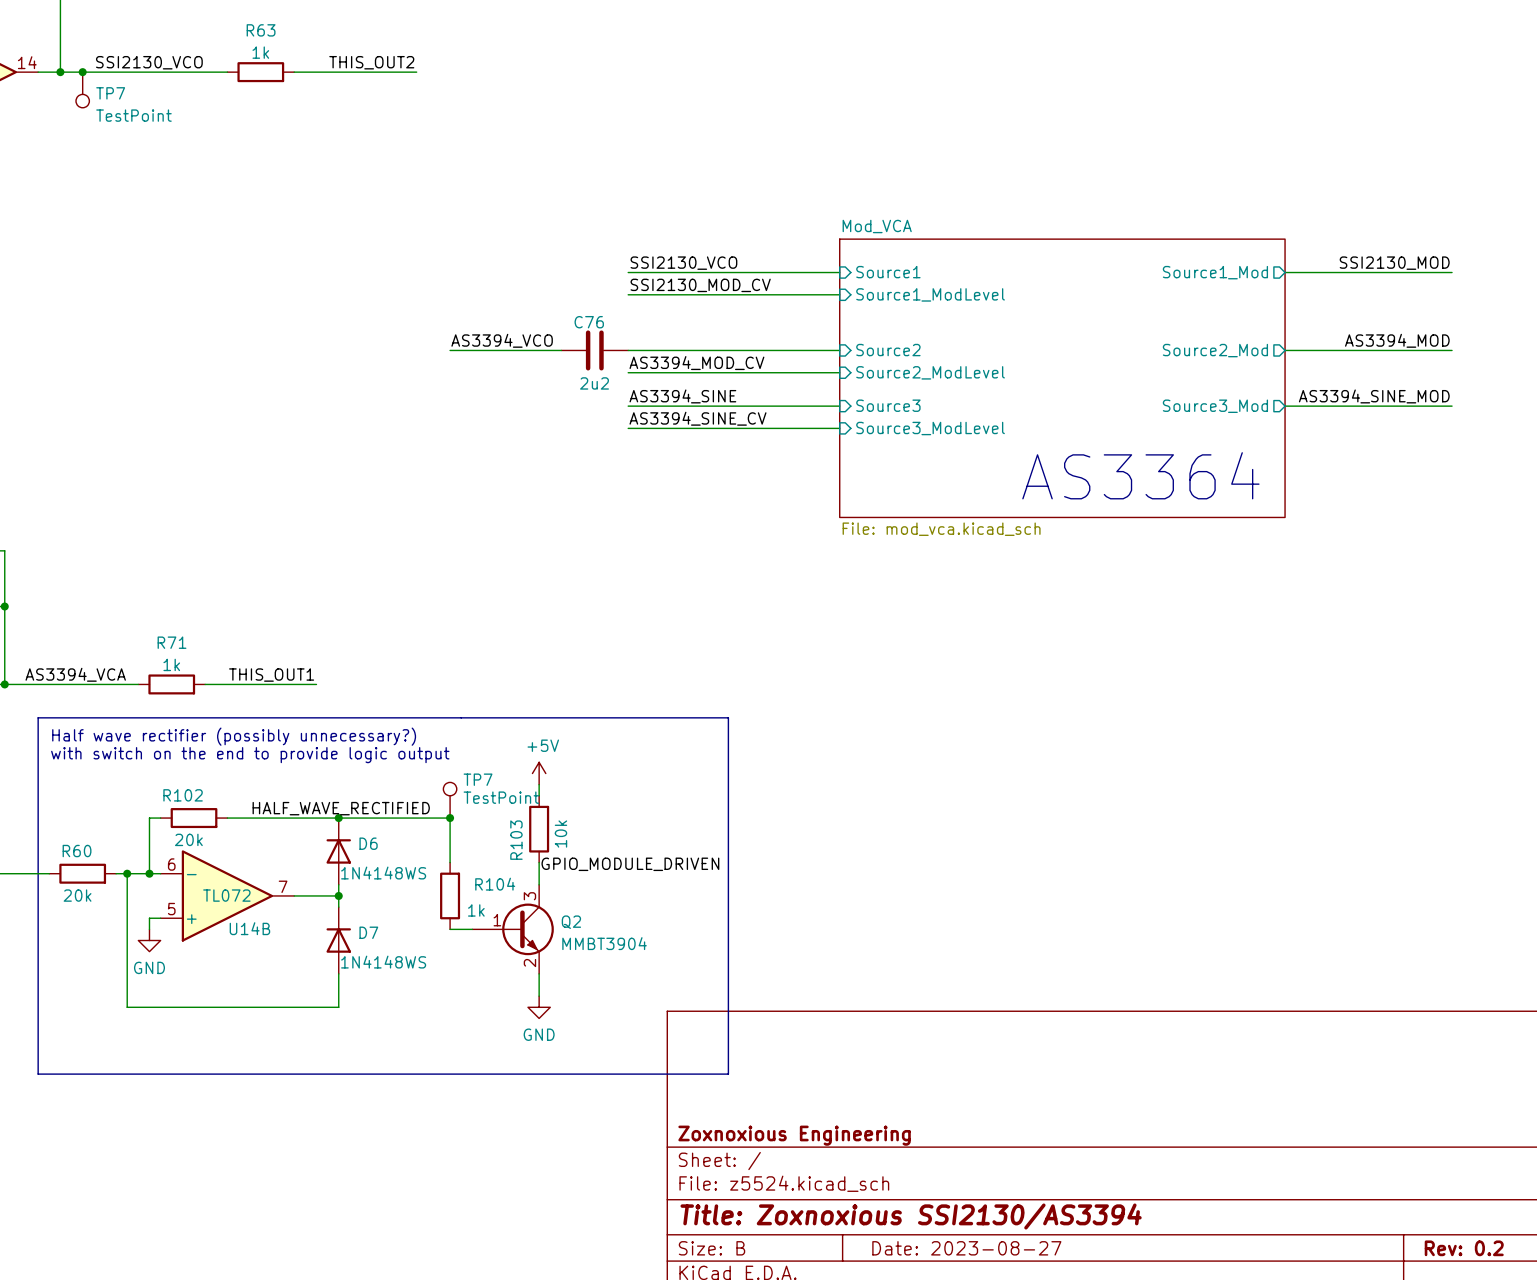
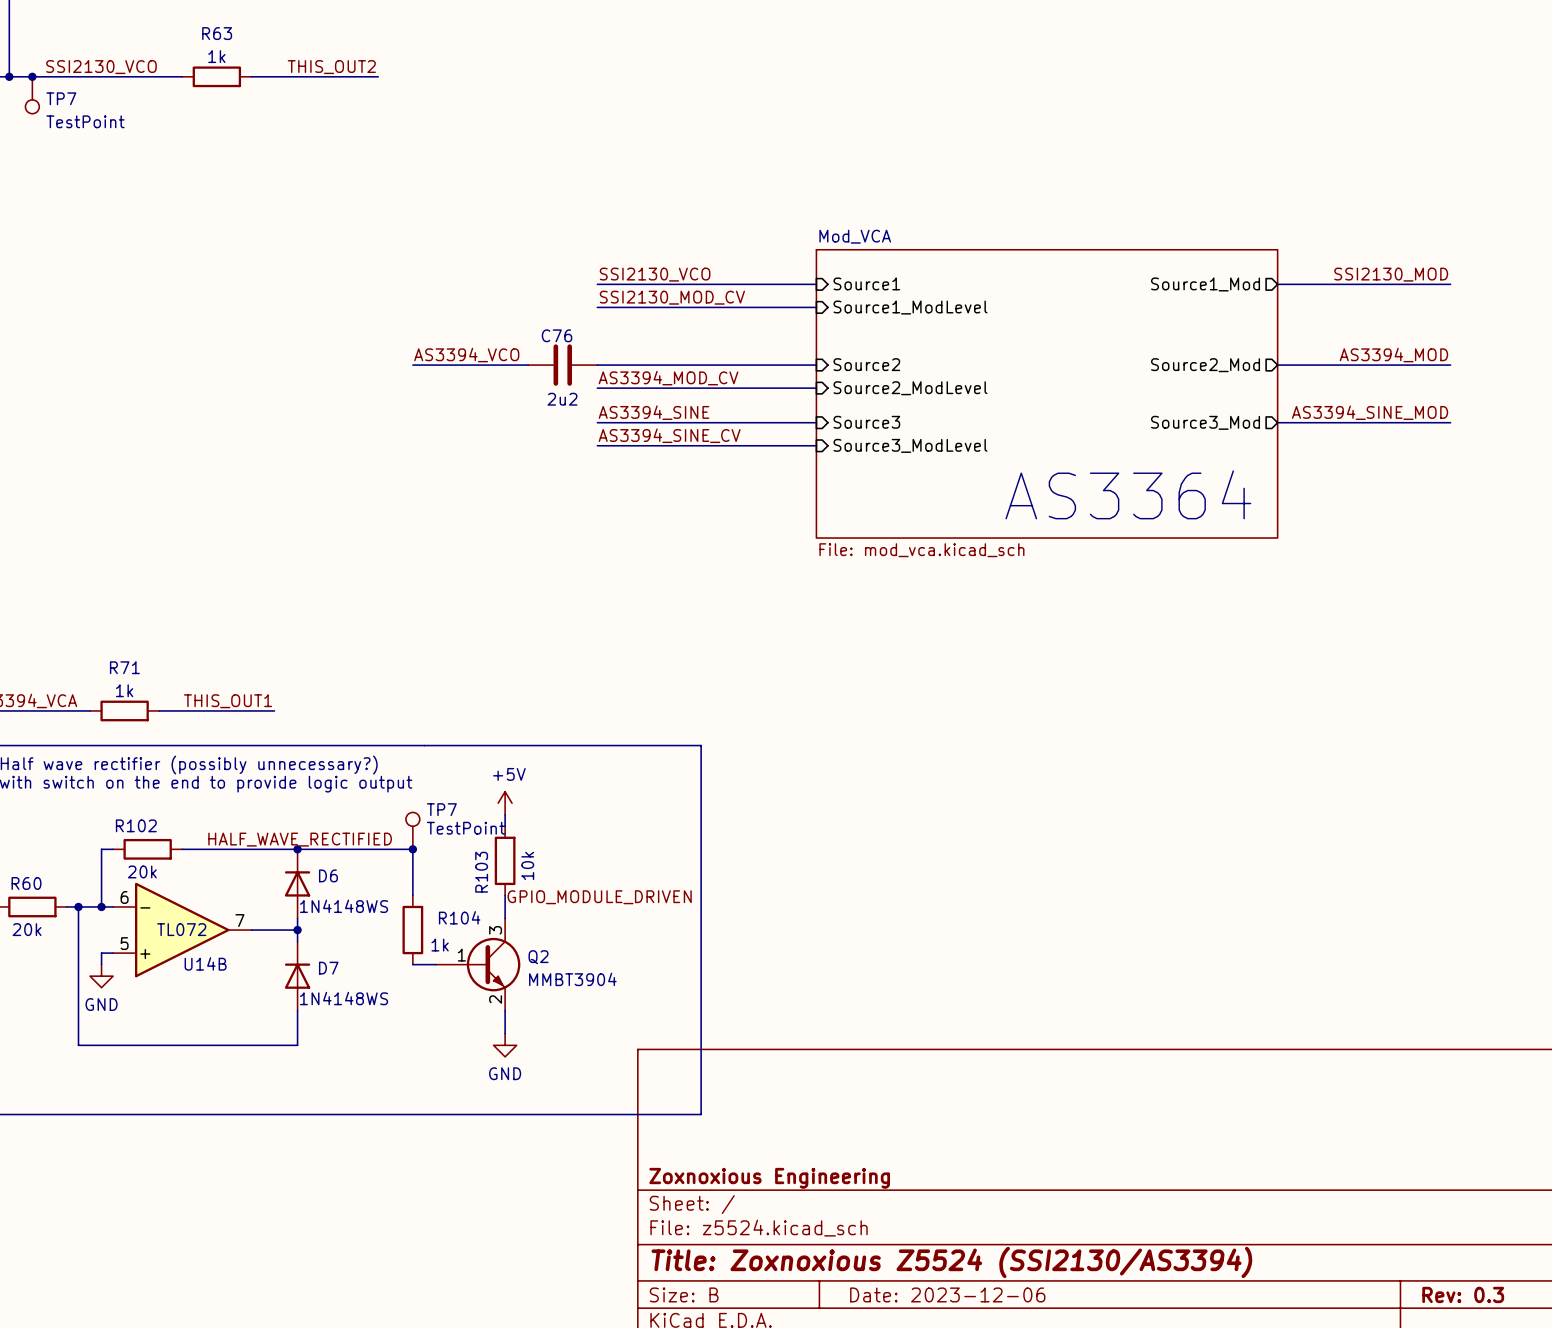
title block: Title: Zoxnoxious SSI2130/AS3394 (911, 1216) -> Title: Zoxnoxious Z5524 (SSI2130/AS3394) (951, 1262)
title block: Date: 2023-08-27 (966, 1248) -> Date: 2023-12-06 (947, 1294)
title block: Rev: 0.2 (1464, 1248) -> Rev: 0.3 (1463, 1294)

